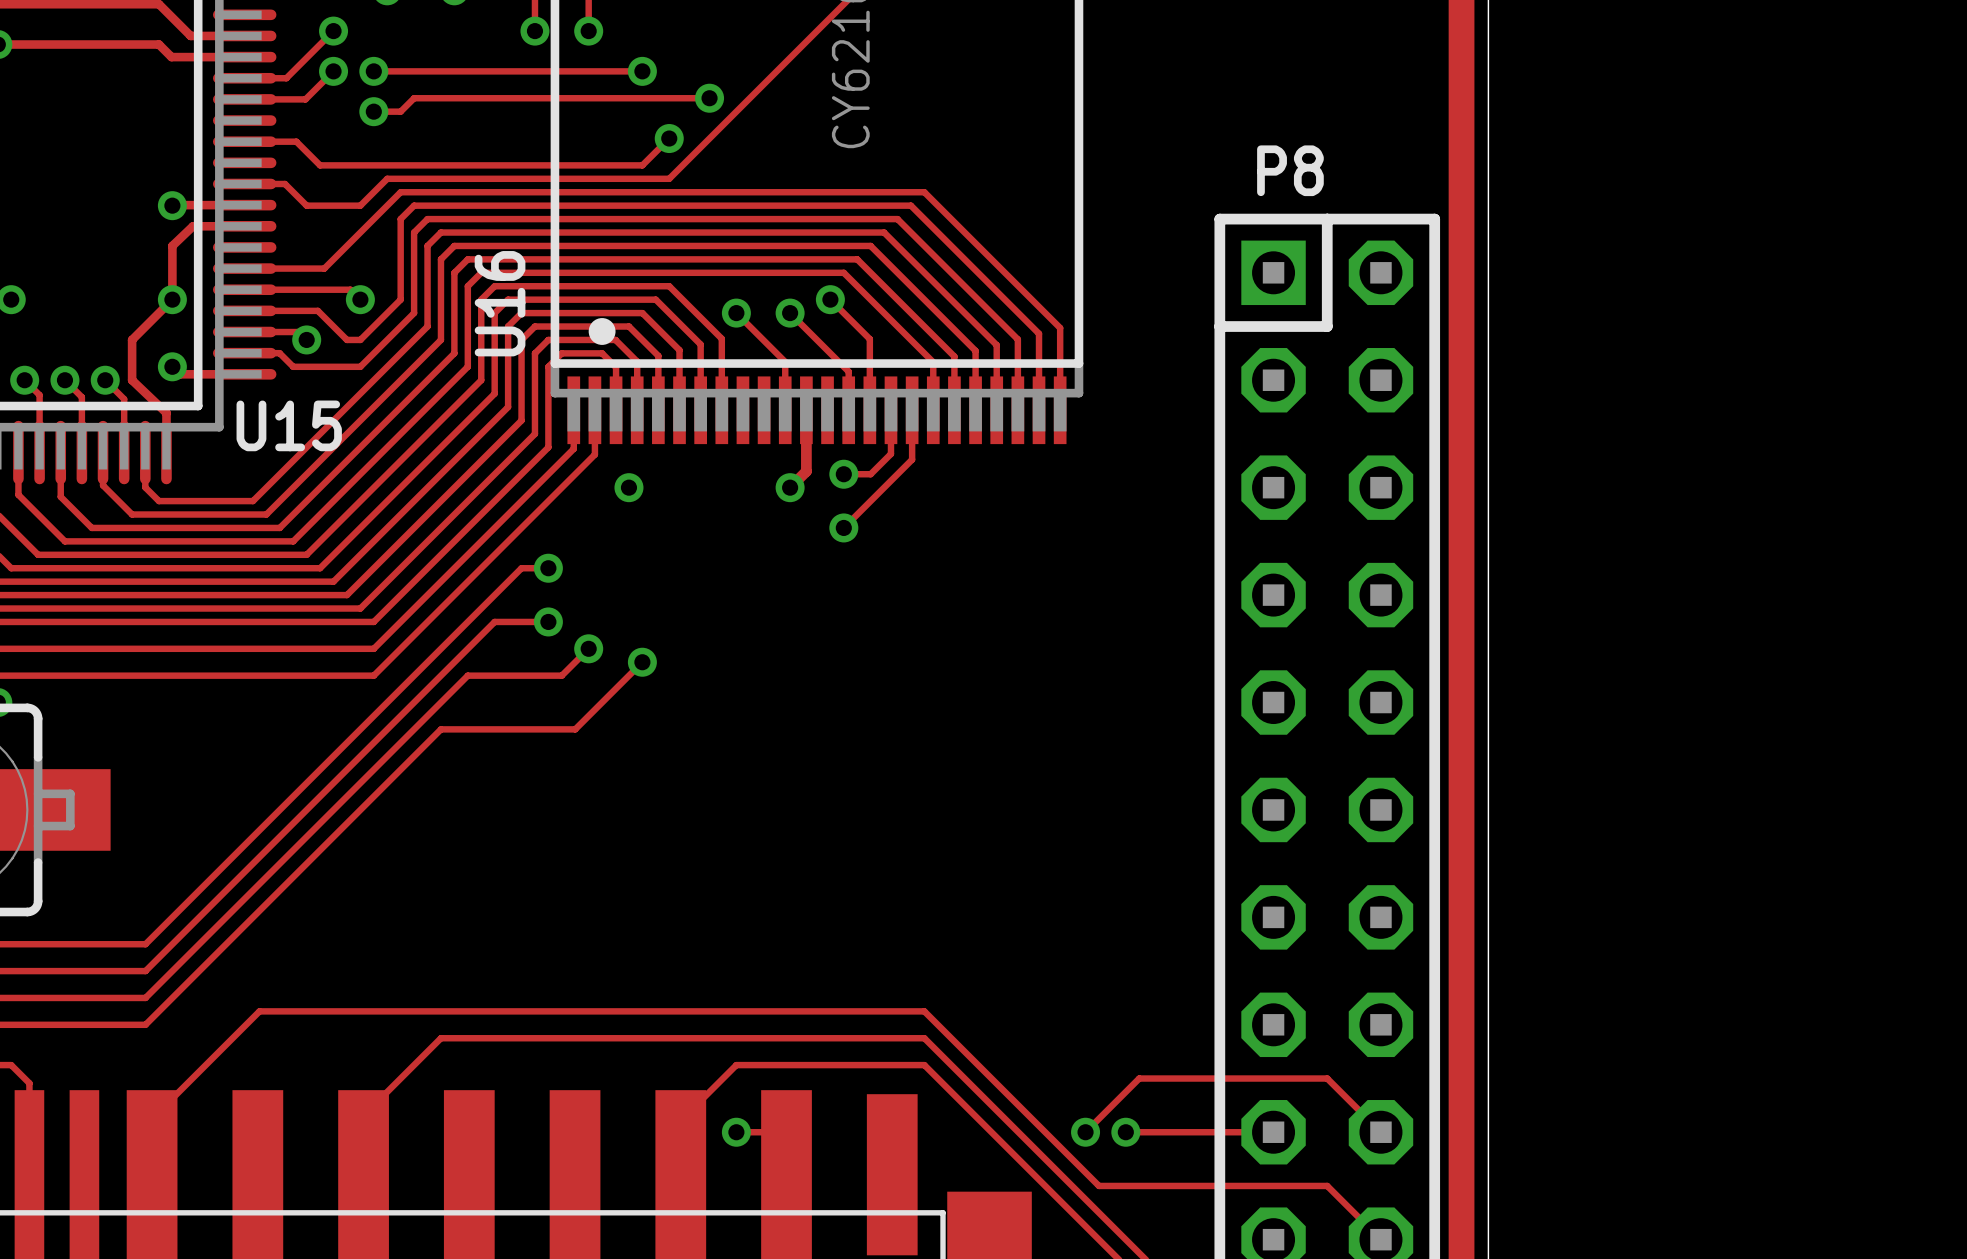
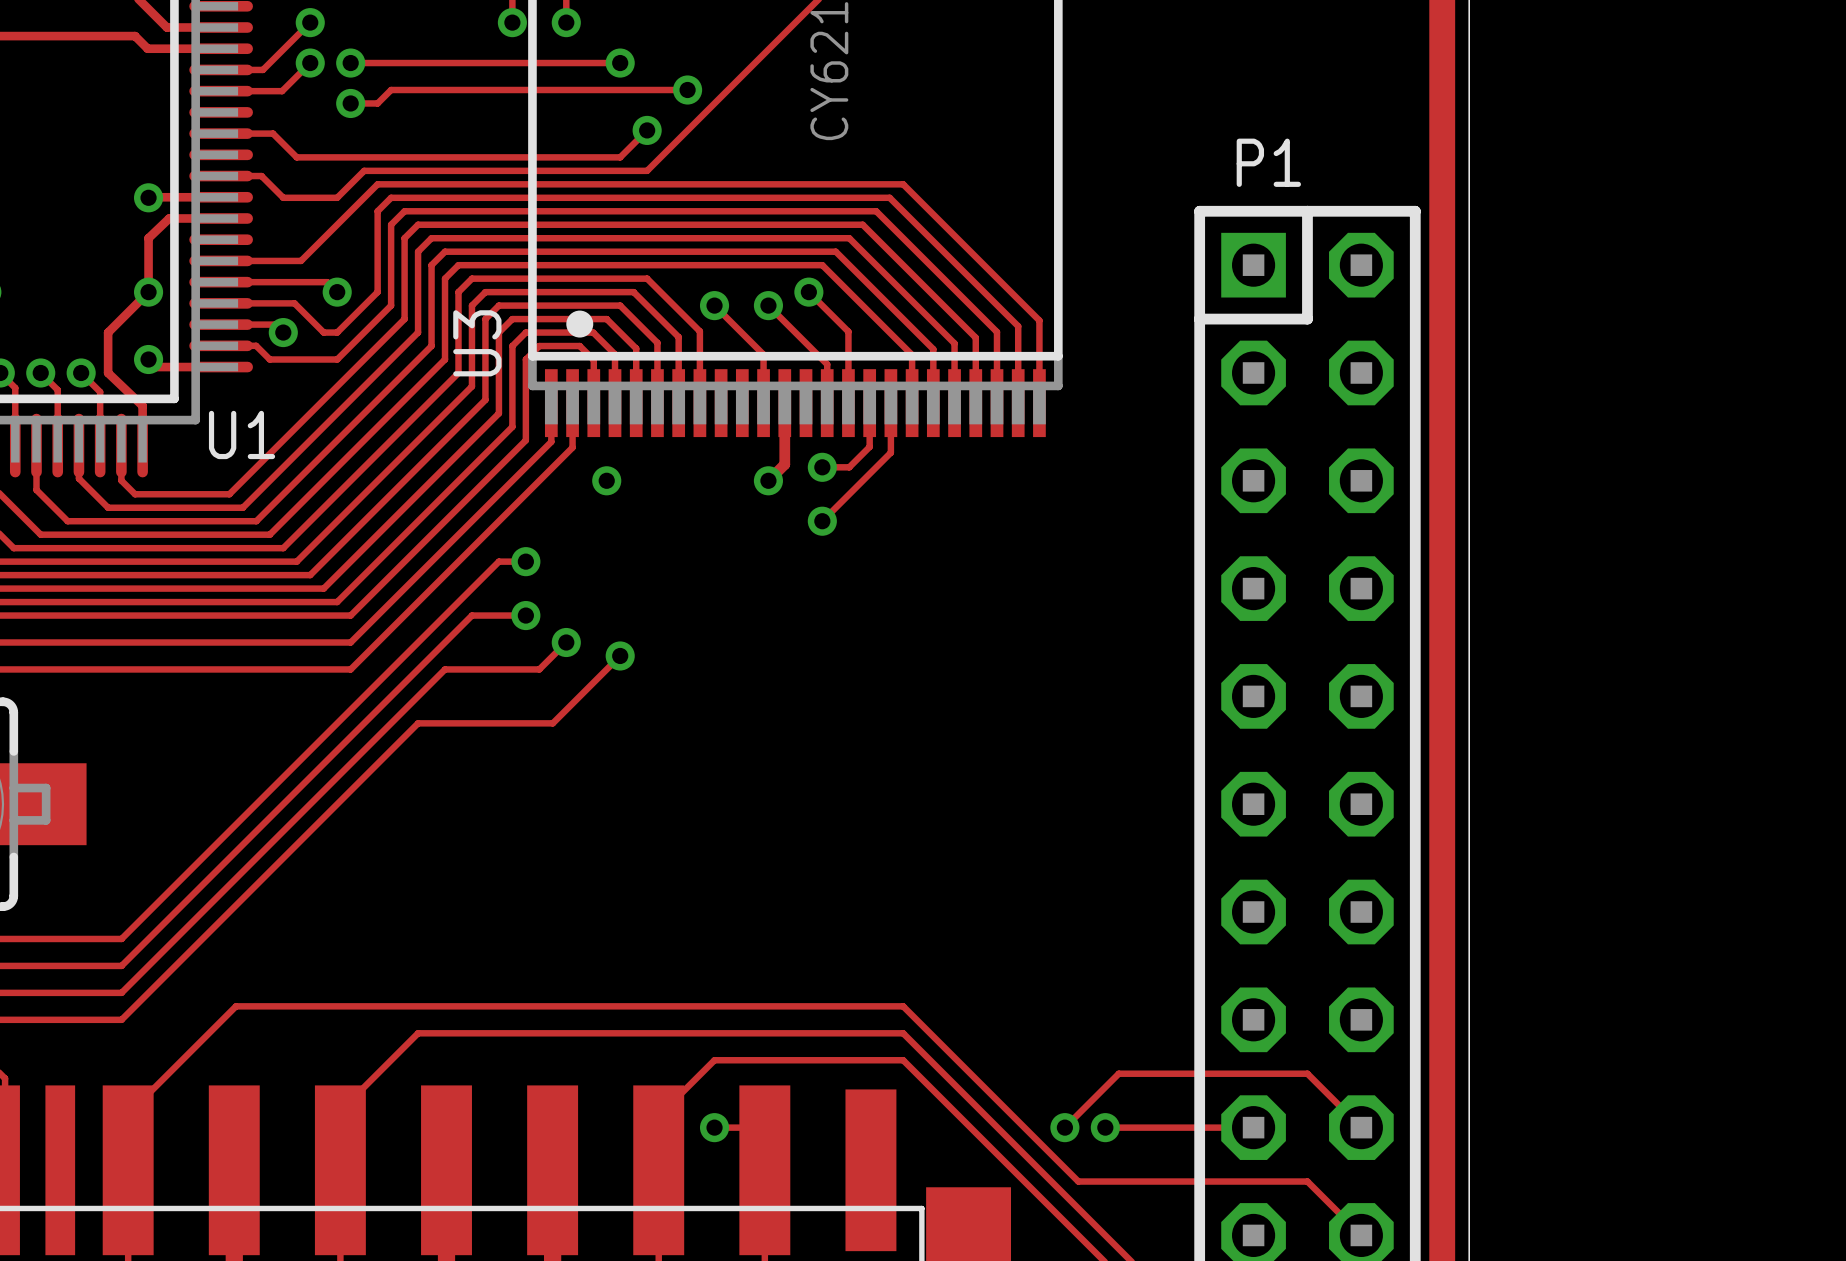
P8 name: P8 (1290, 170) -> P1 (1268, 162)
U16 name: U16 (500, 303) -> U3 (477, 343)
U15 name: U15 (289, 425) -> U1 (242, 434)

